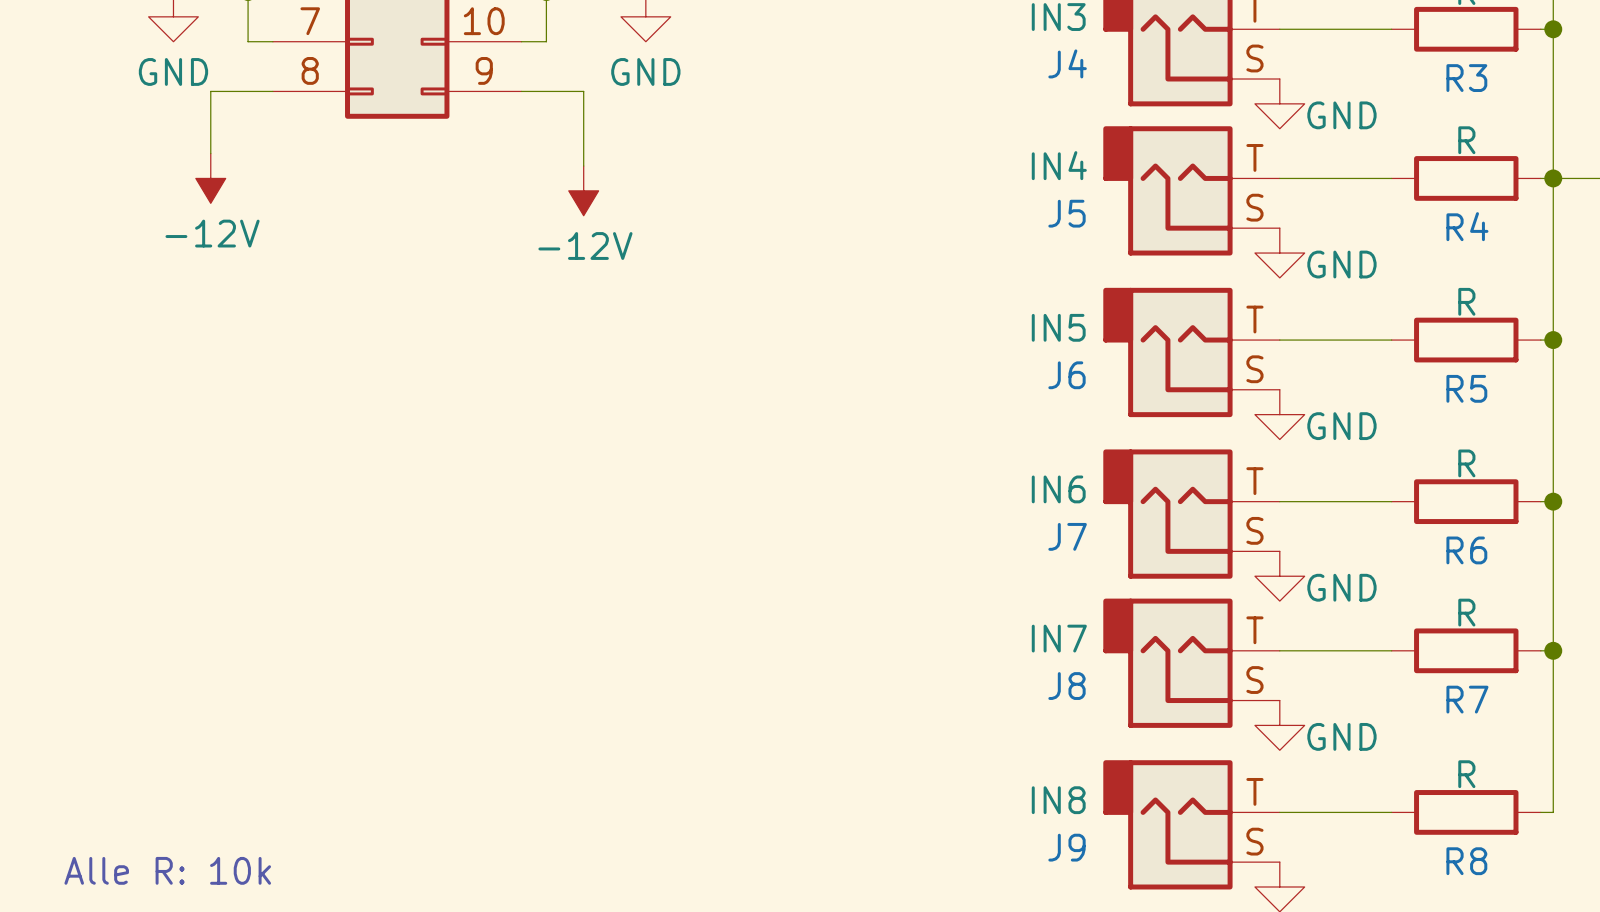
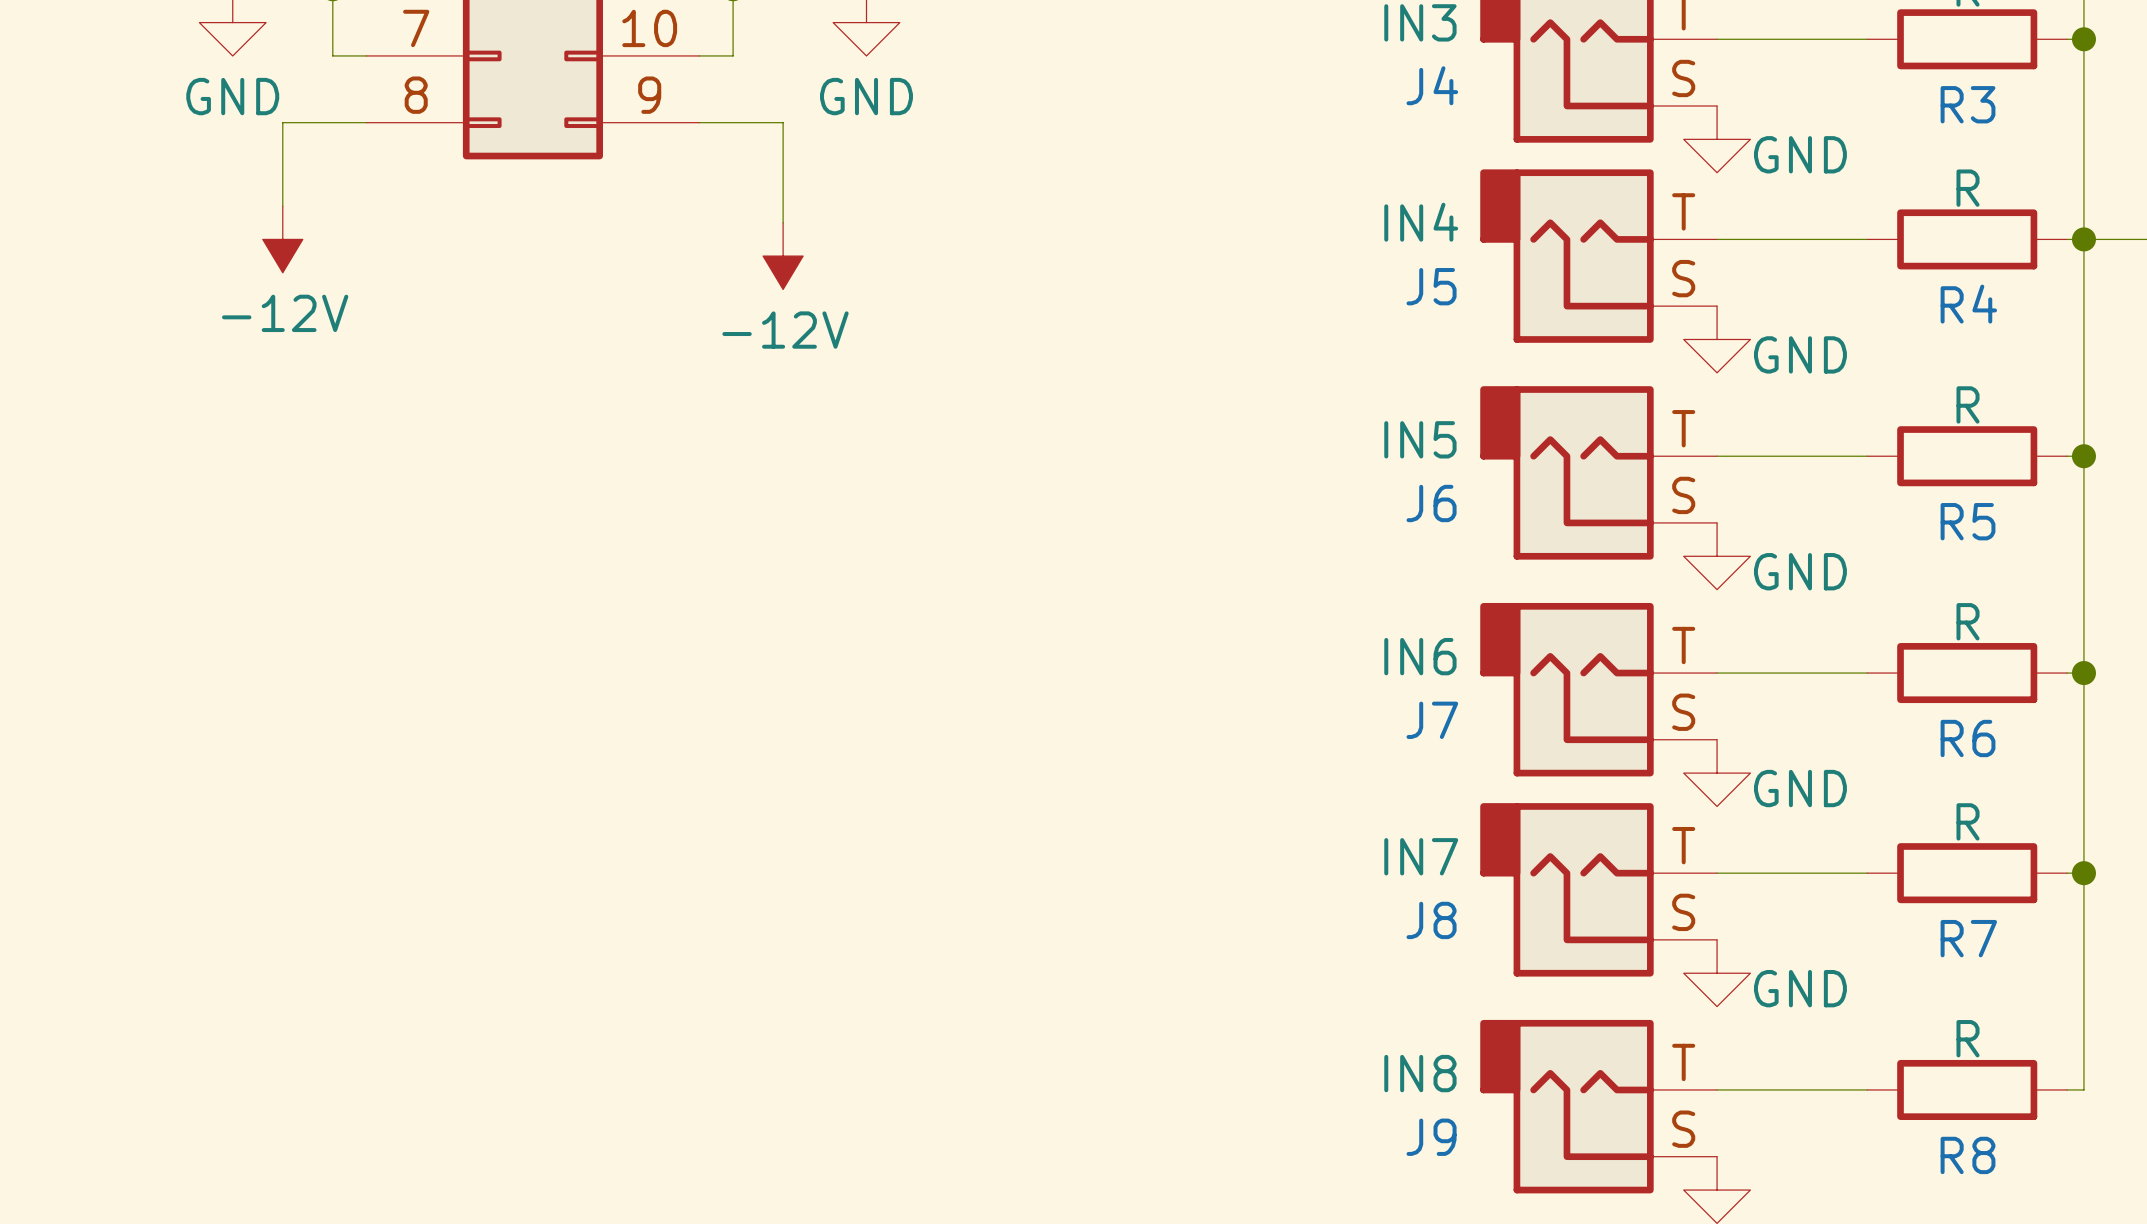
text: Alle R: 10k (167, 870) -> none

